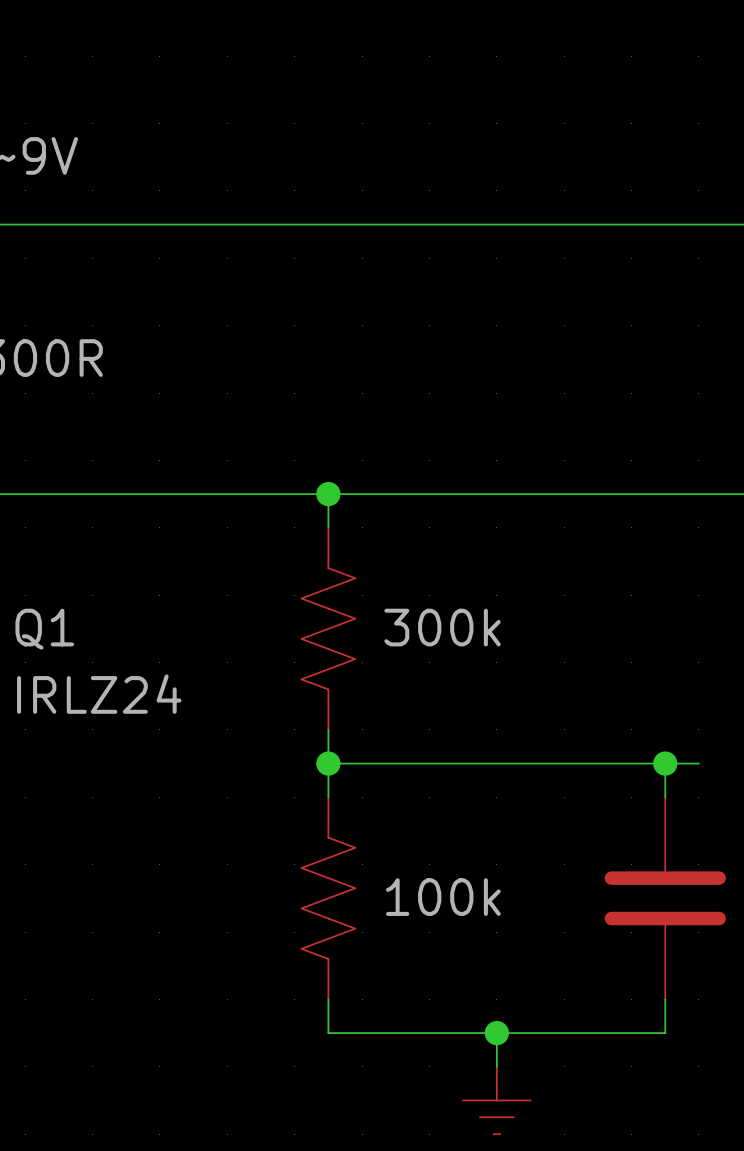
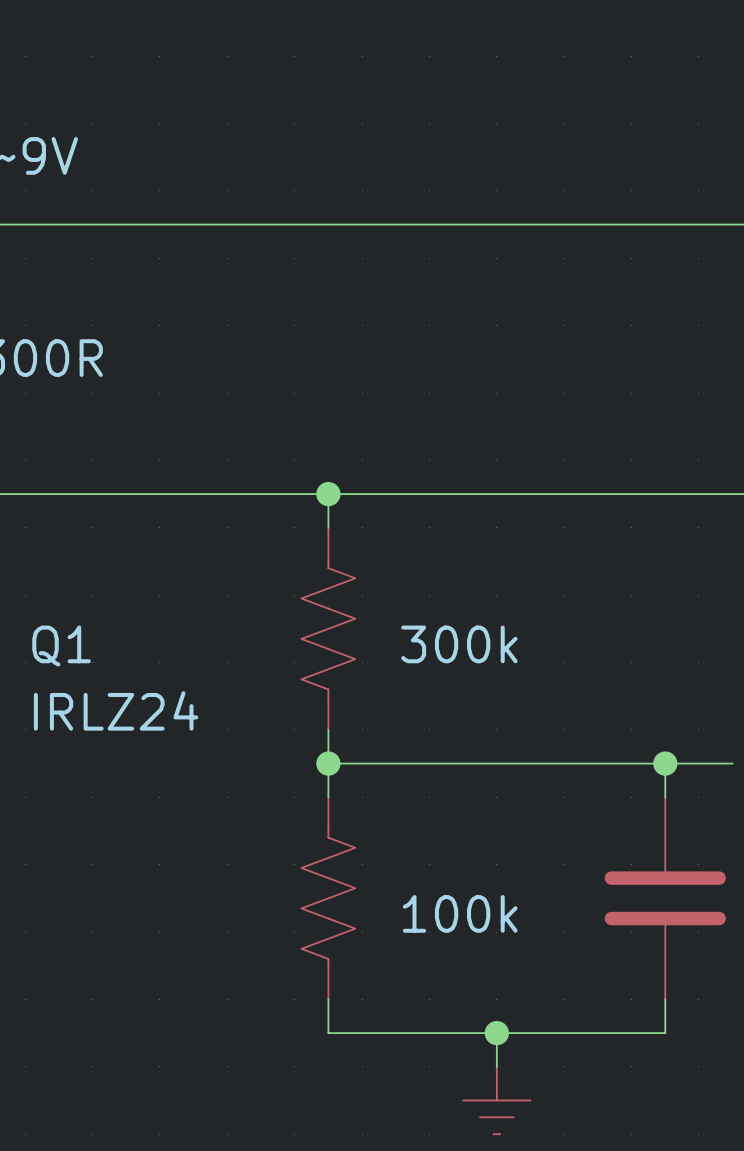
part value position: 300k (442, 627) -> 300k (459, 644)
Q1 name position: Q1 (44, 629) -> Q1 (61, 646)
Q1 value position: IRLZ24 (99, 694) -> IRLZ24 (116, 710)
wire: none -> (698, 763) (732, 763)
part value position: 100k (443, 897) -> 100k (460, 913)

